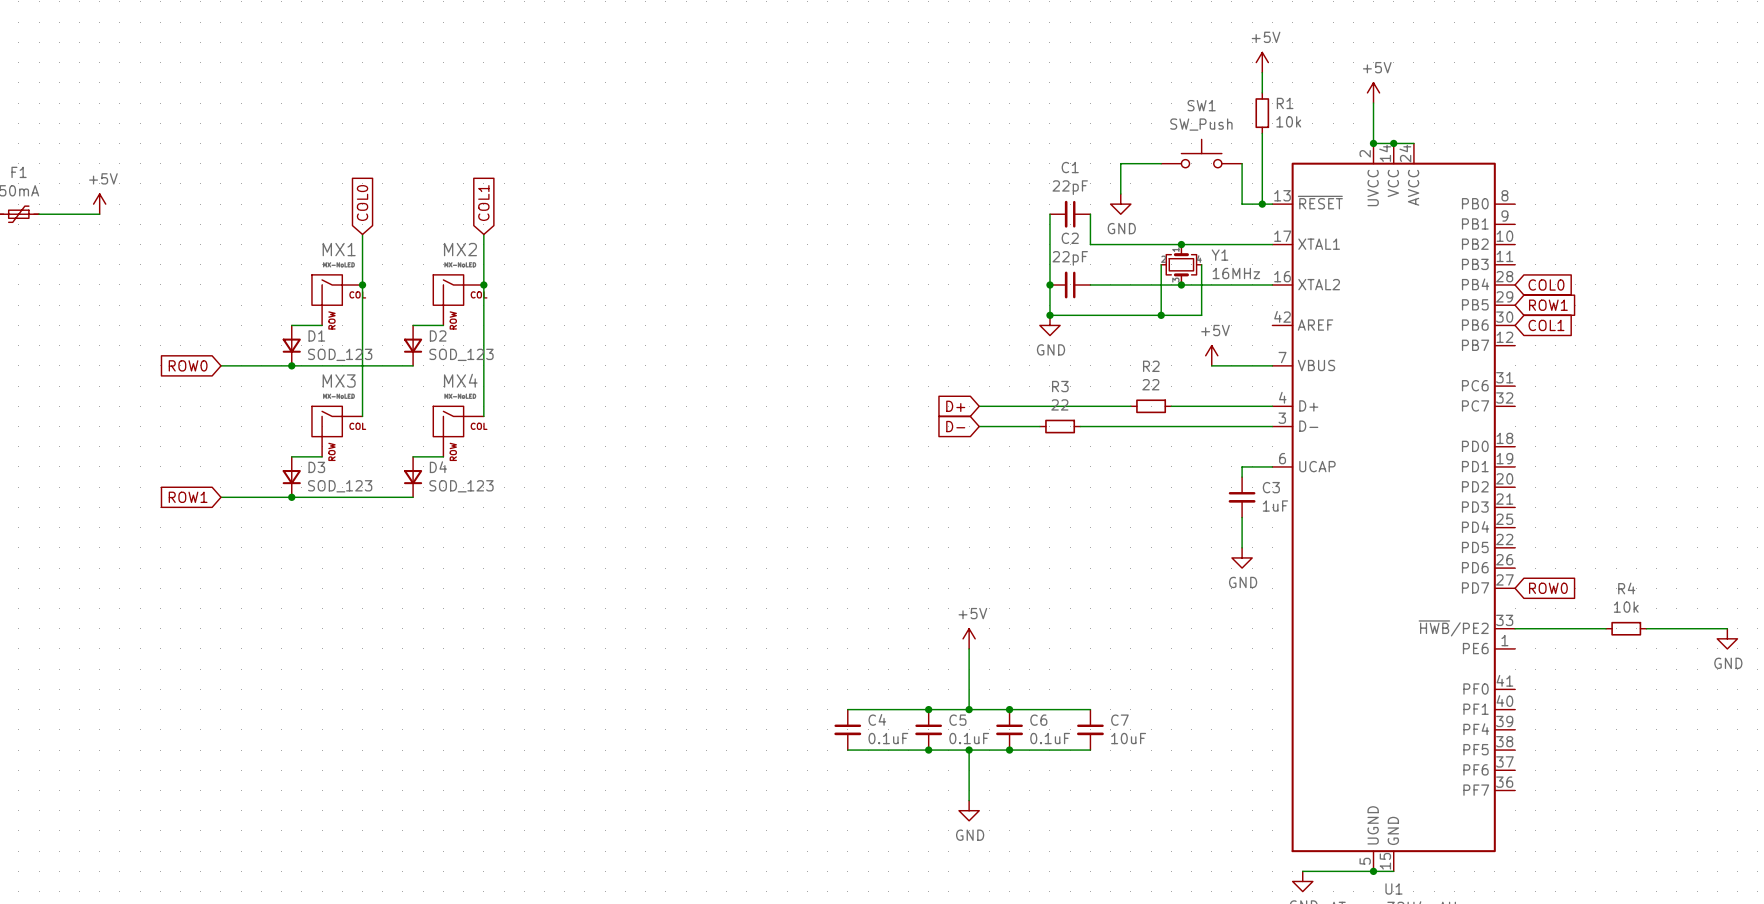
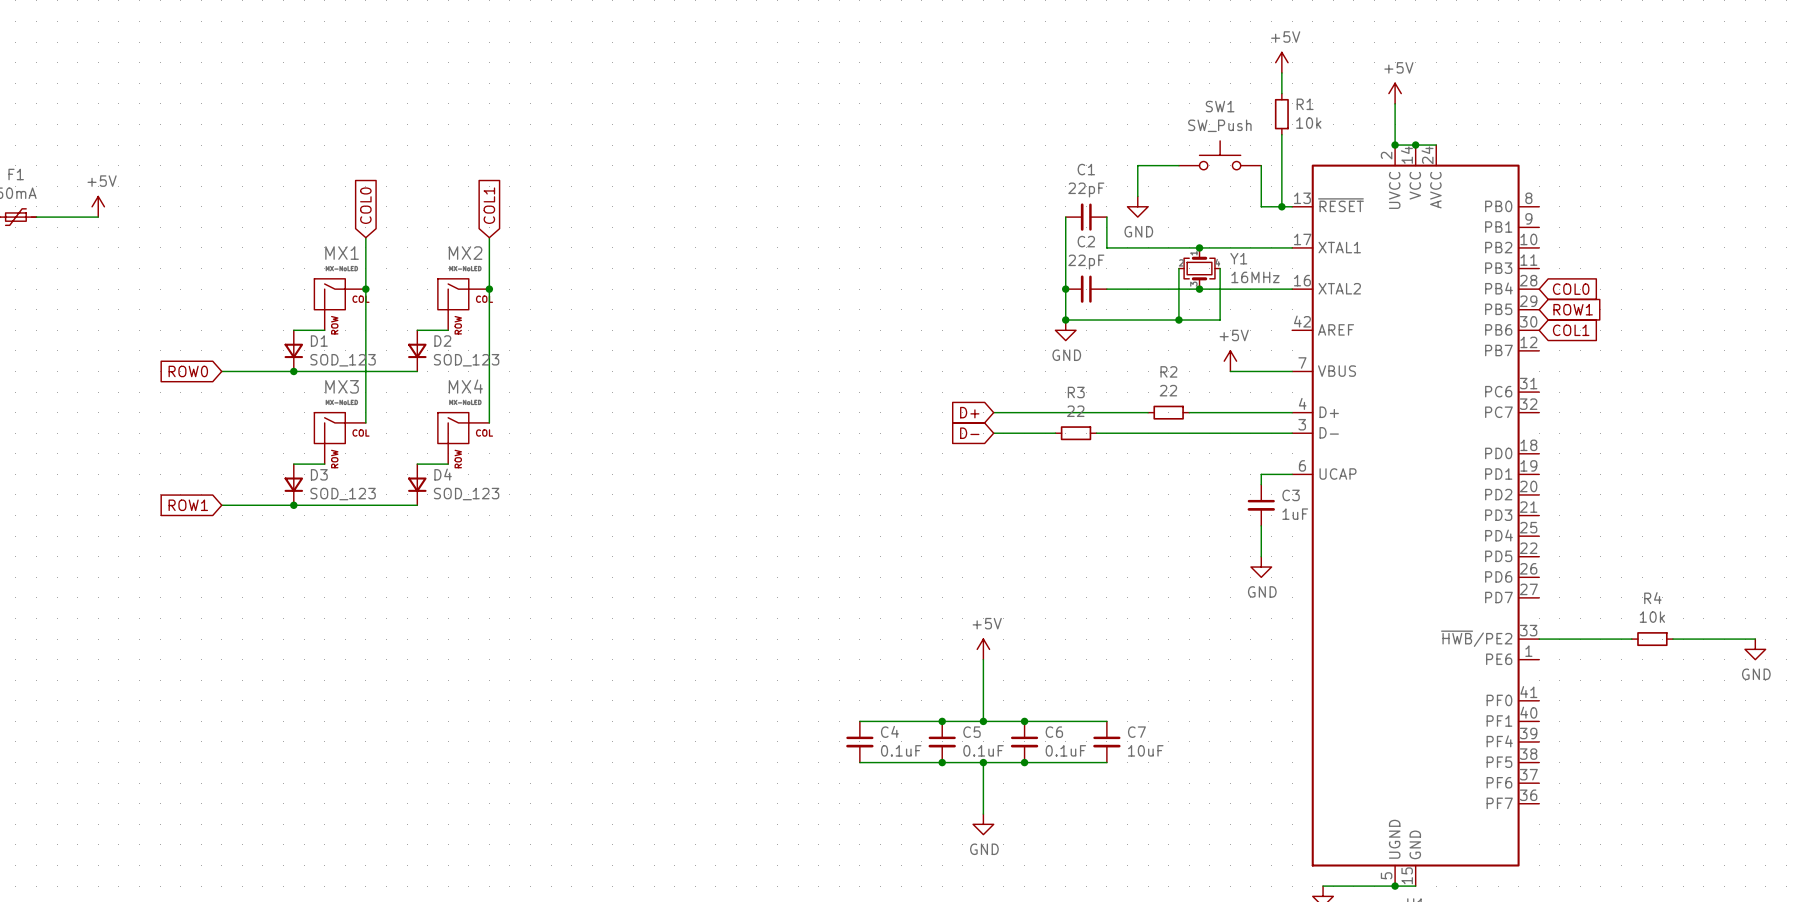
global label: ROW0 (1548, 588) -> none

